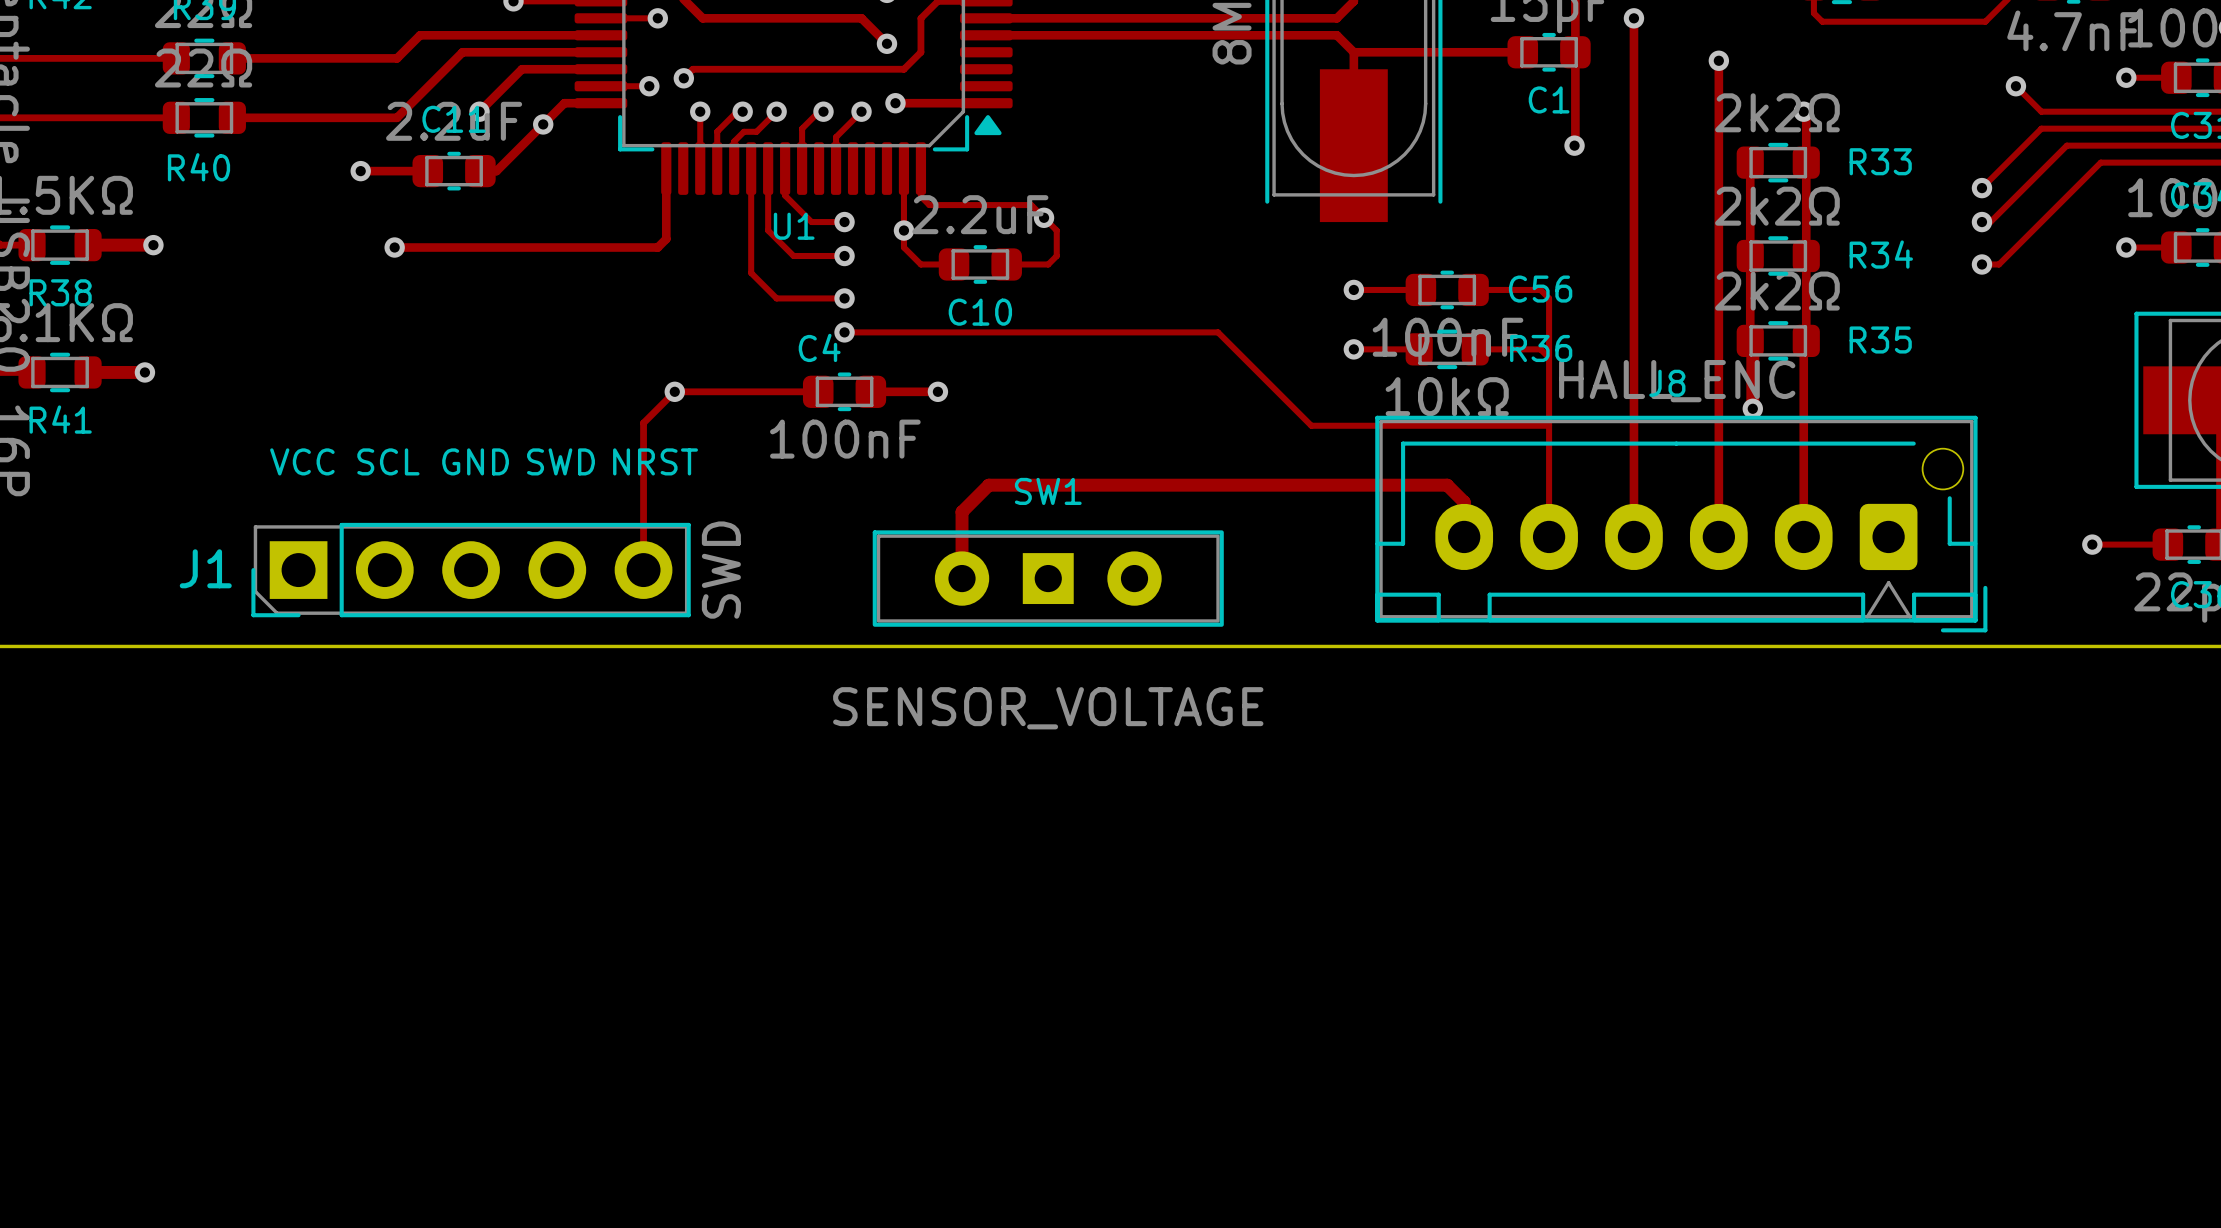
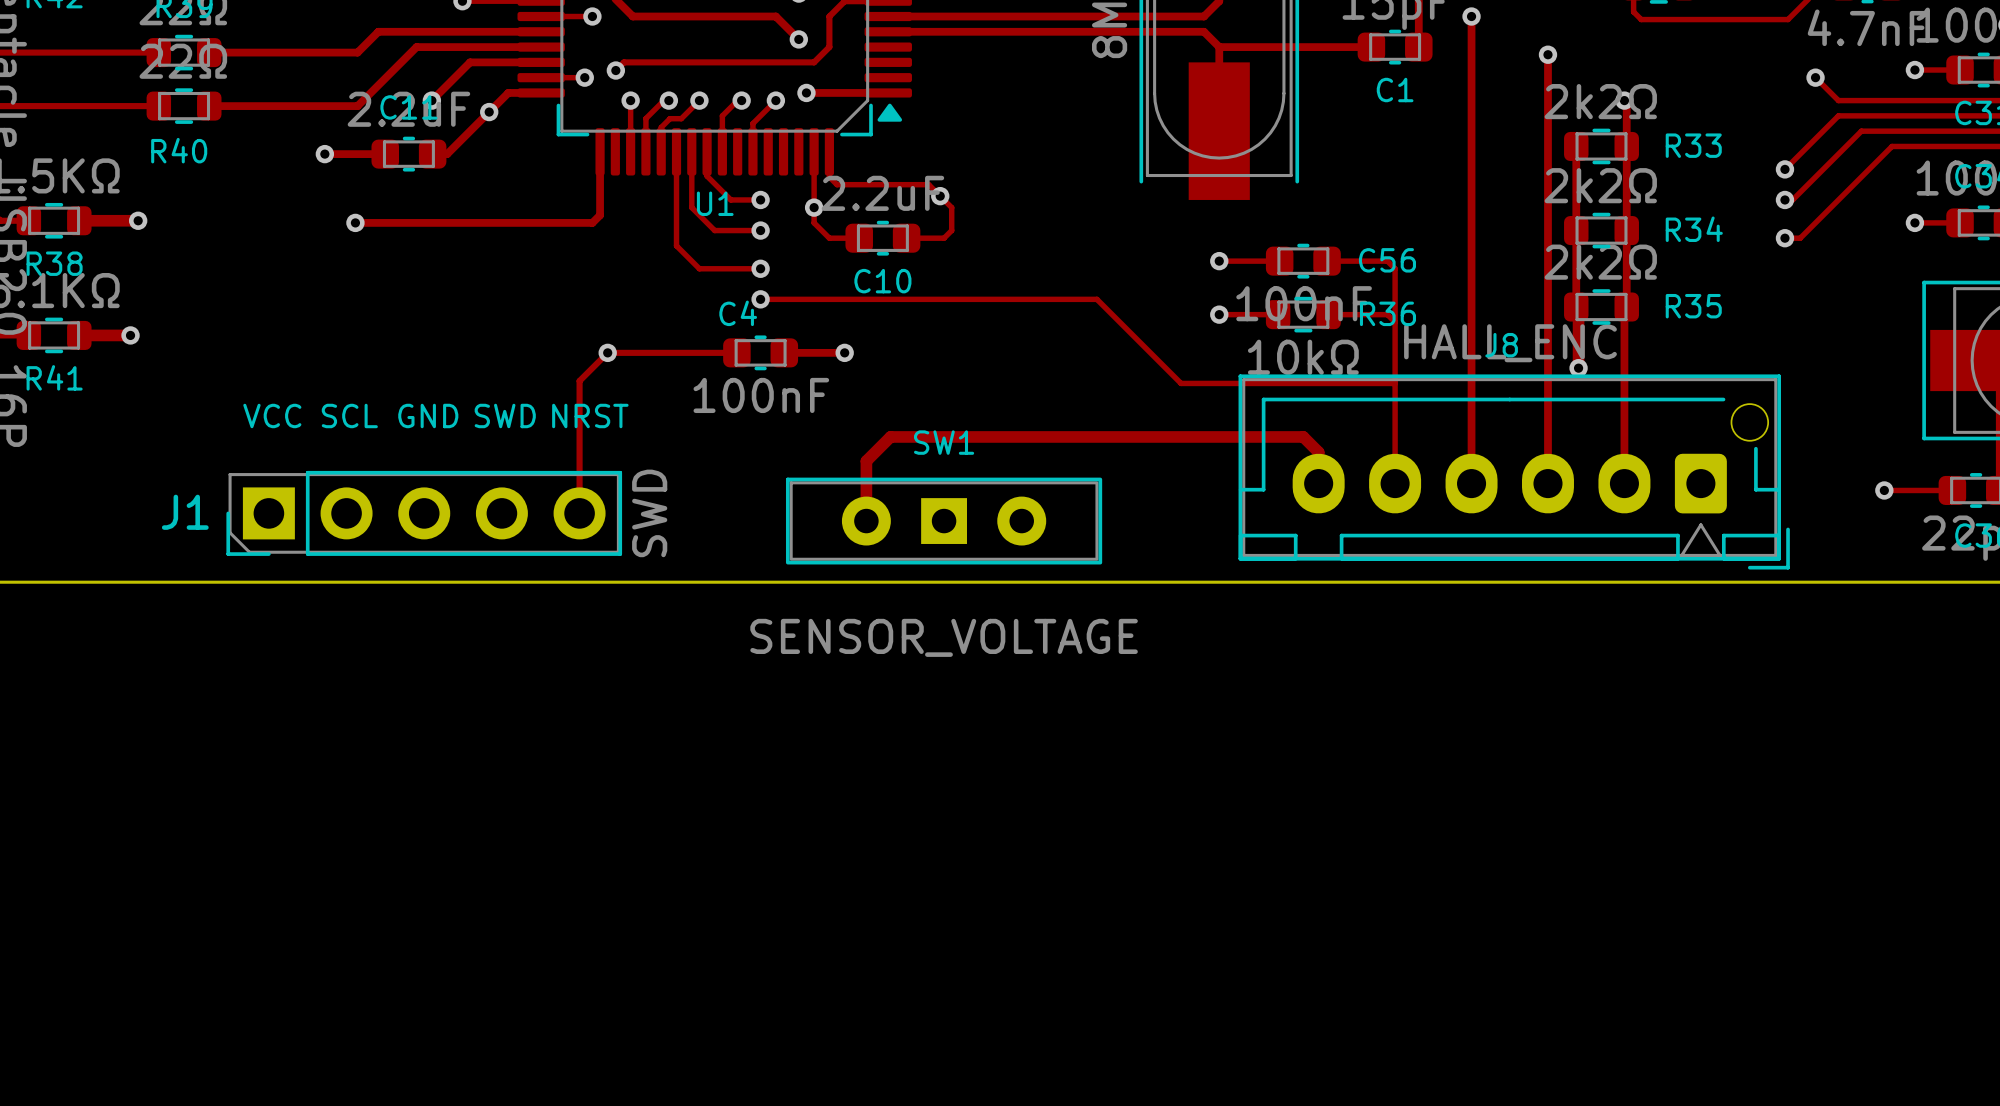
track: (1575, 52) (1574, 145) -> none
via: (1574, 145) -> none

